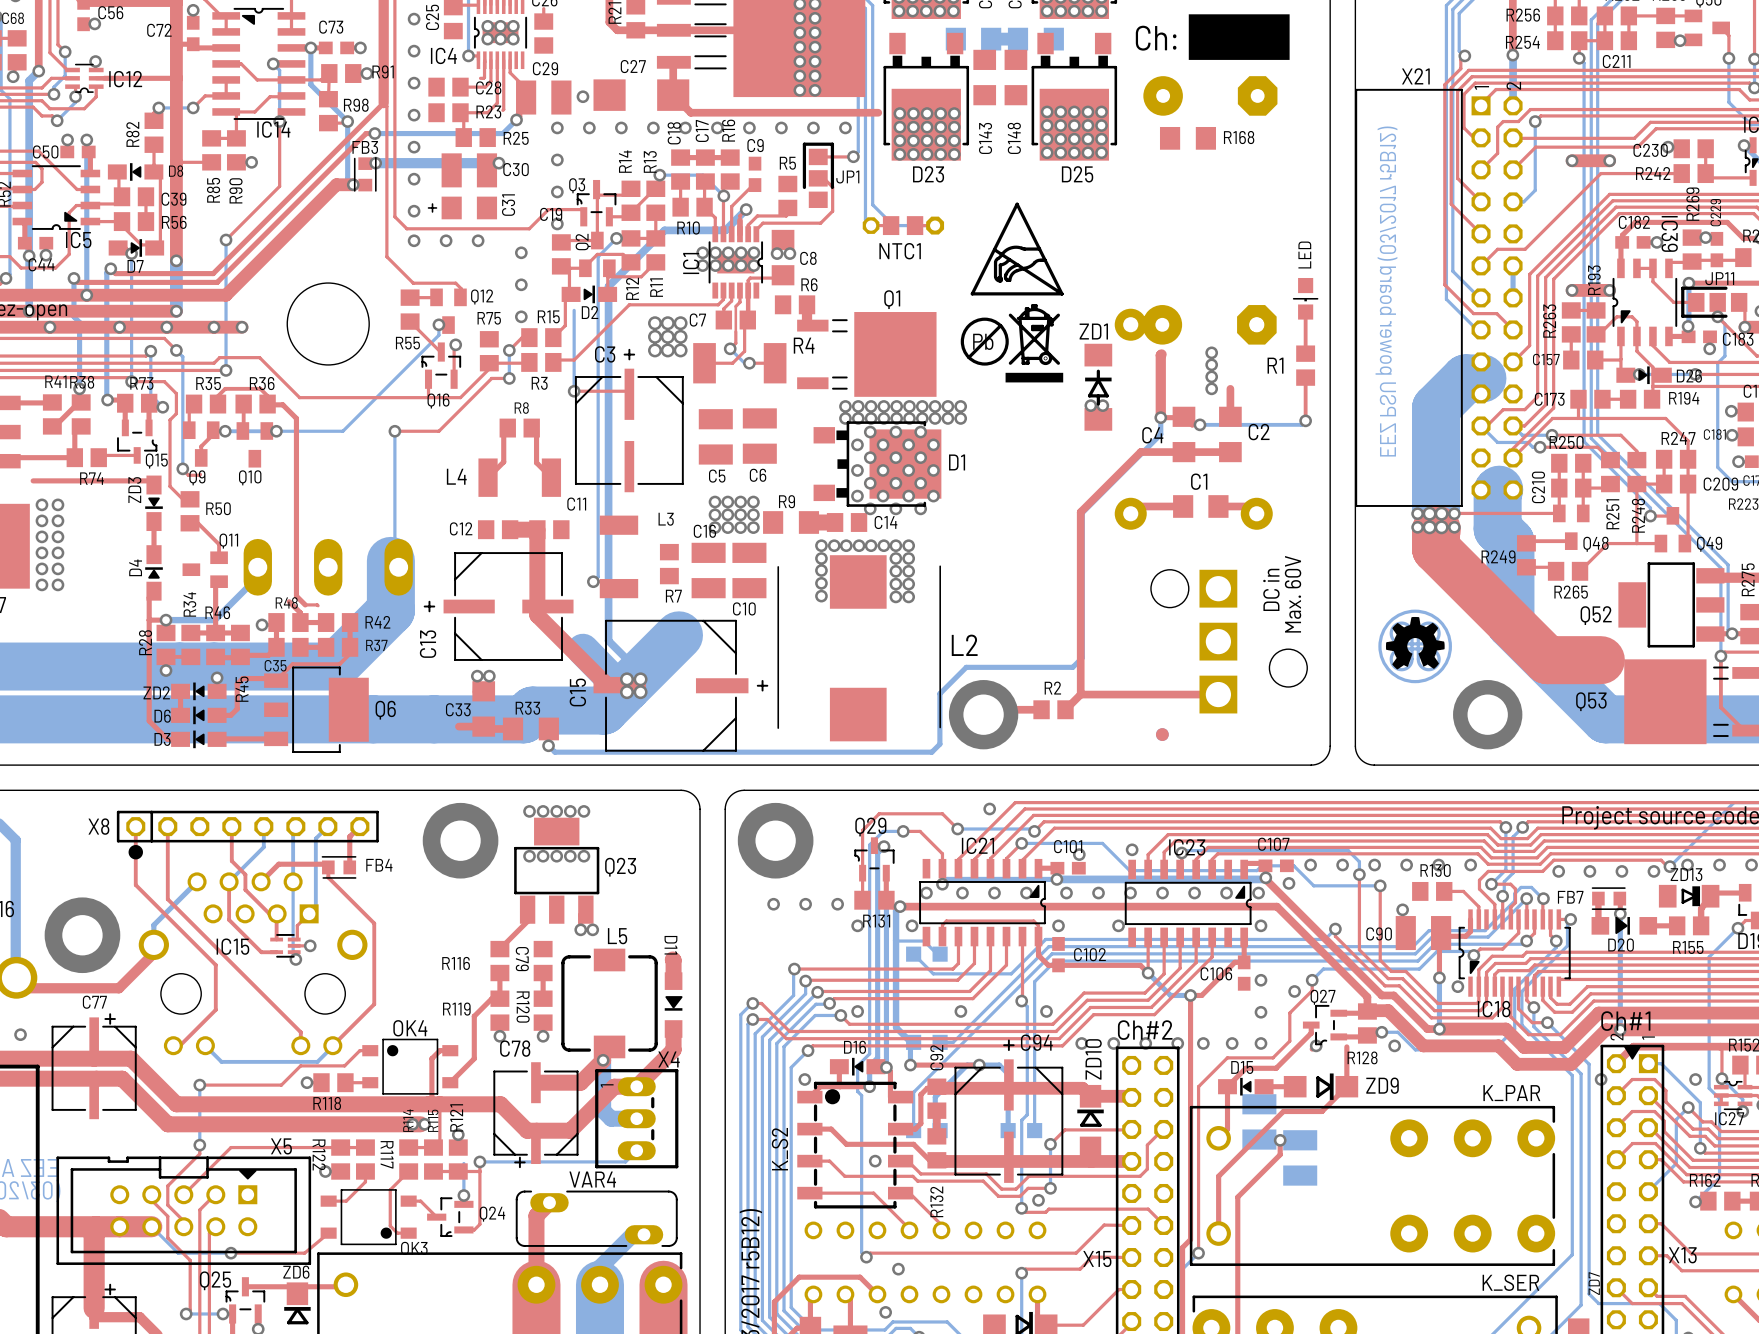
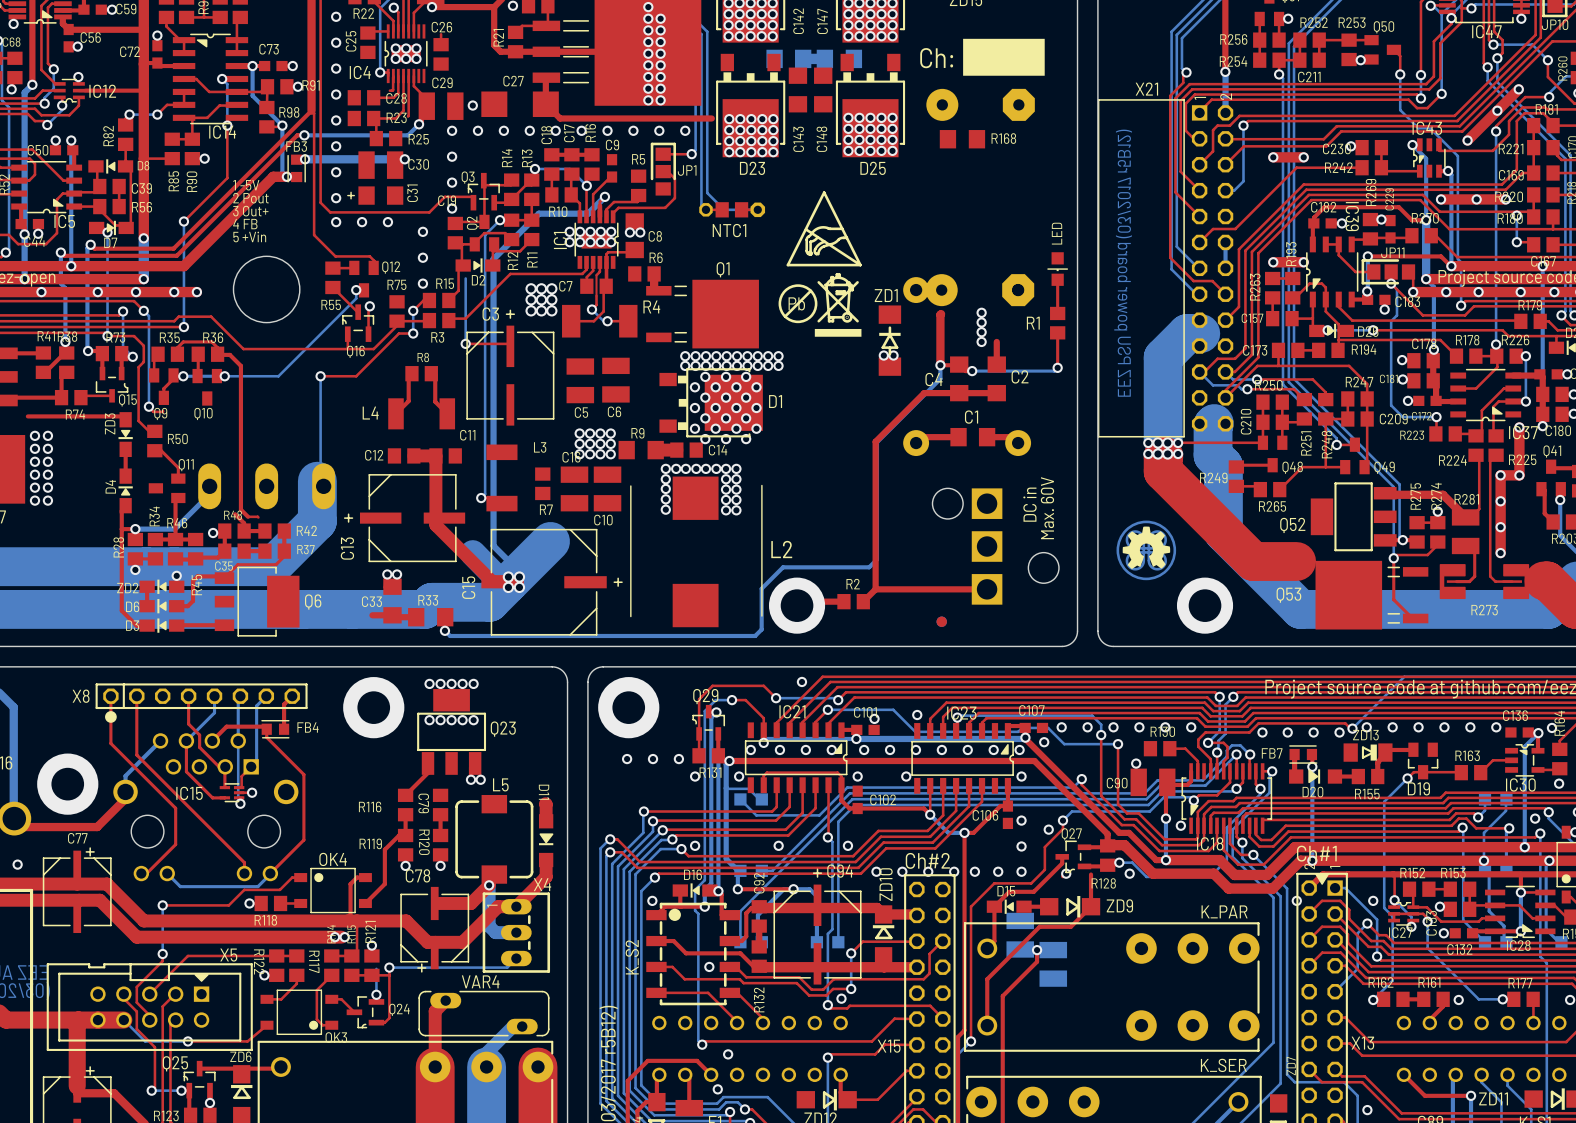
text: none -> 1 -5V (246, 185)
text: none -> 2 Pout (250, 198)
text: none -> 3 Out+ (250, 211)
text: none -> 4 FB (245, 224)
text: none -> 5 +Vin (249, 236)

